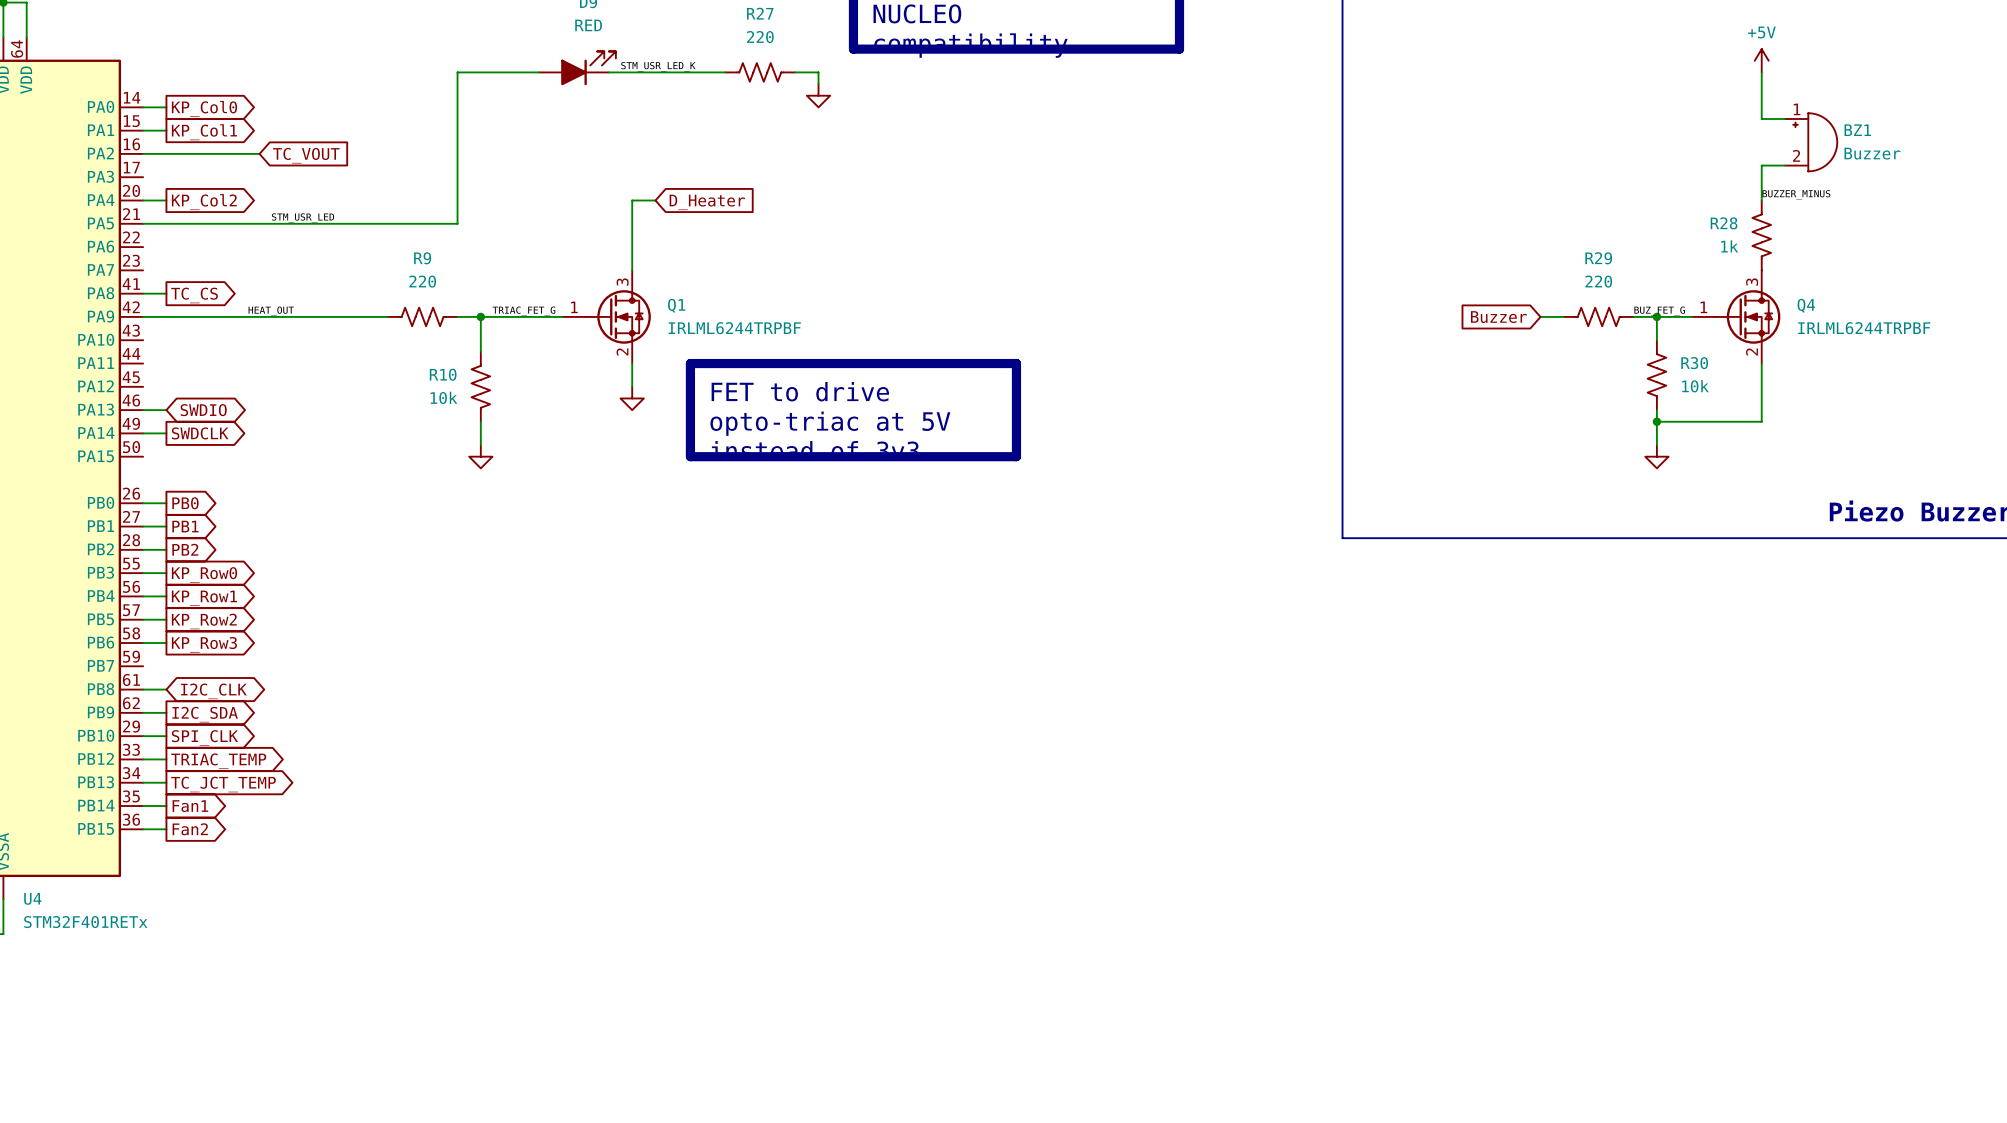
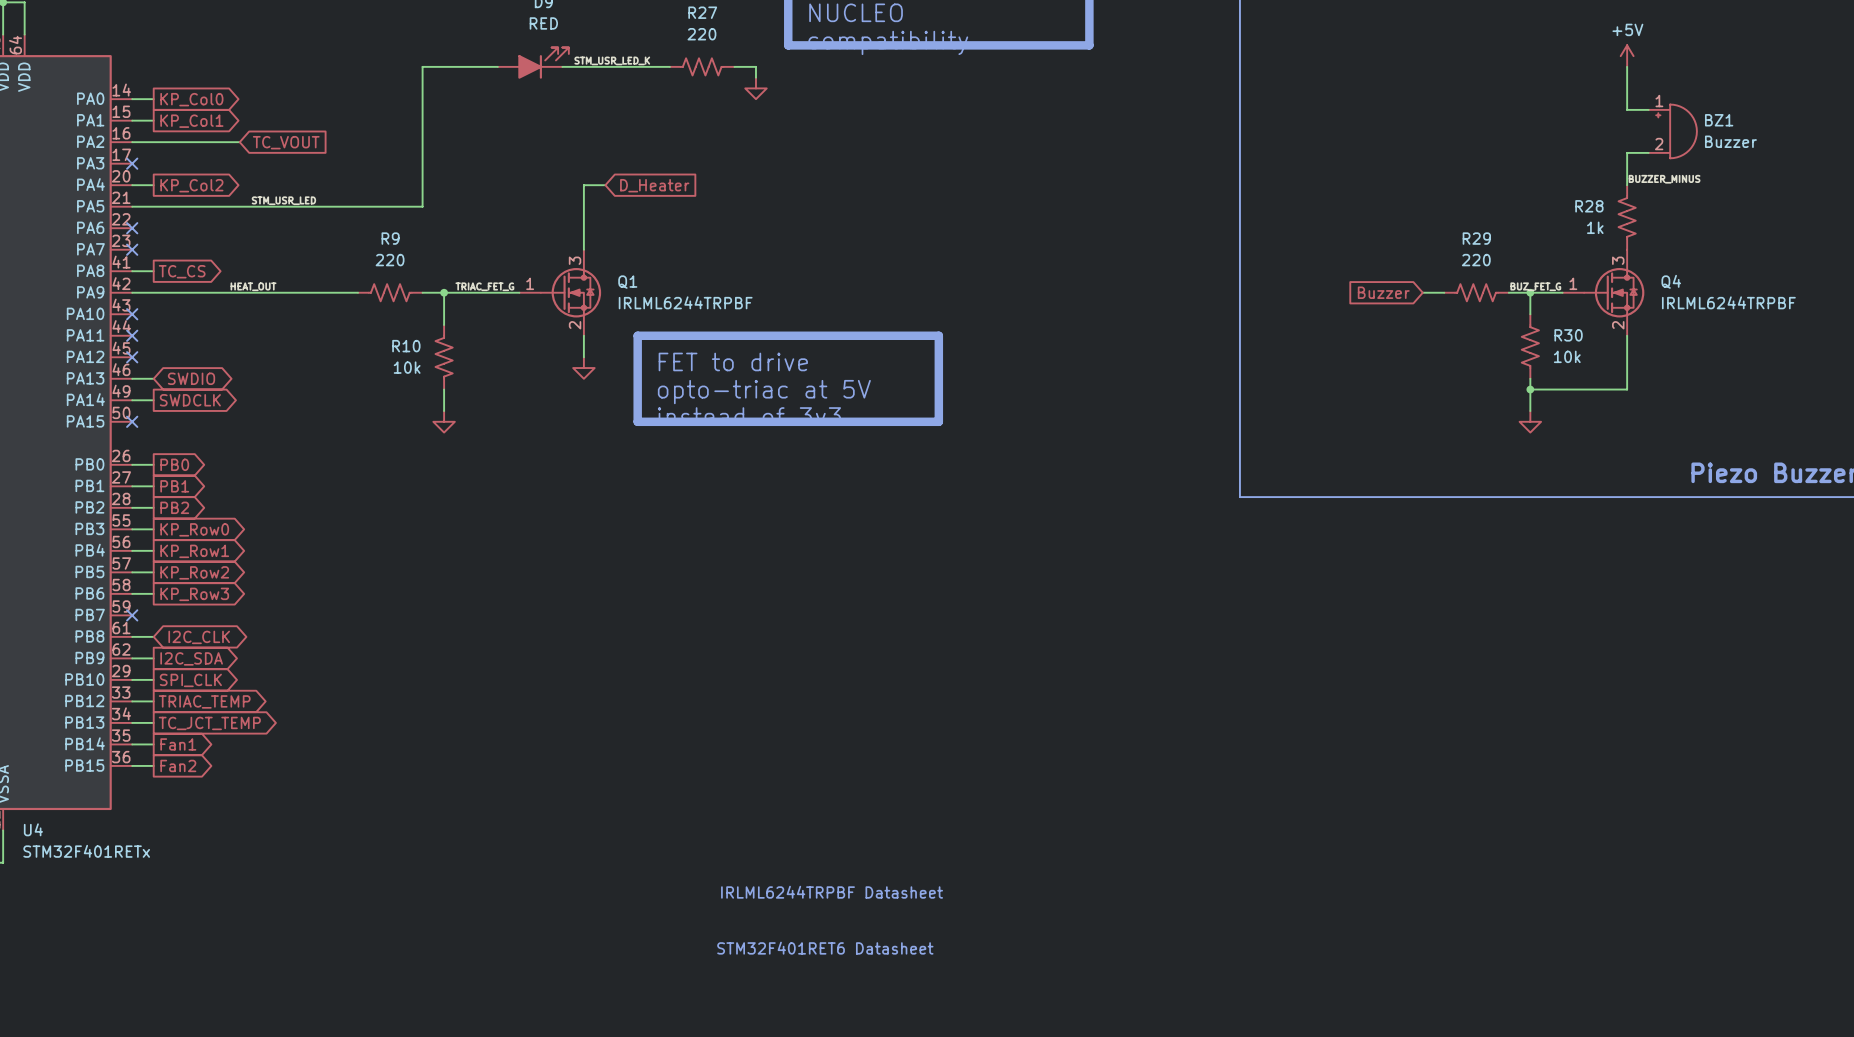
no-connect mark: none -> (132, 163)
no-connect mark: none -> (132, 228)
no-connect mark: none -> (132, 249)
no-connect mark: none -> (132, 314)
no-connect mark: none -> (132, 335)
no-connect mark: none -> (132, 357)
no-connect mark: none -> (132, 421)
no-connect mark: none -> (132, 615)
text: none -> IRLML6244TRPBF Datasheet (832, 892)
text: none -> STM32F401RET6 Datasheet (825, 948)

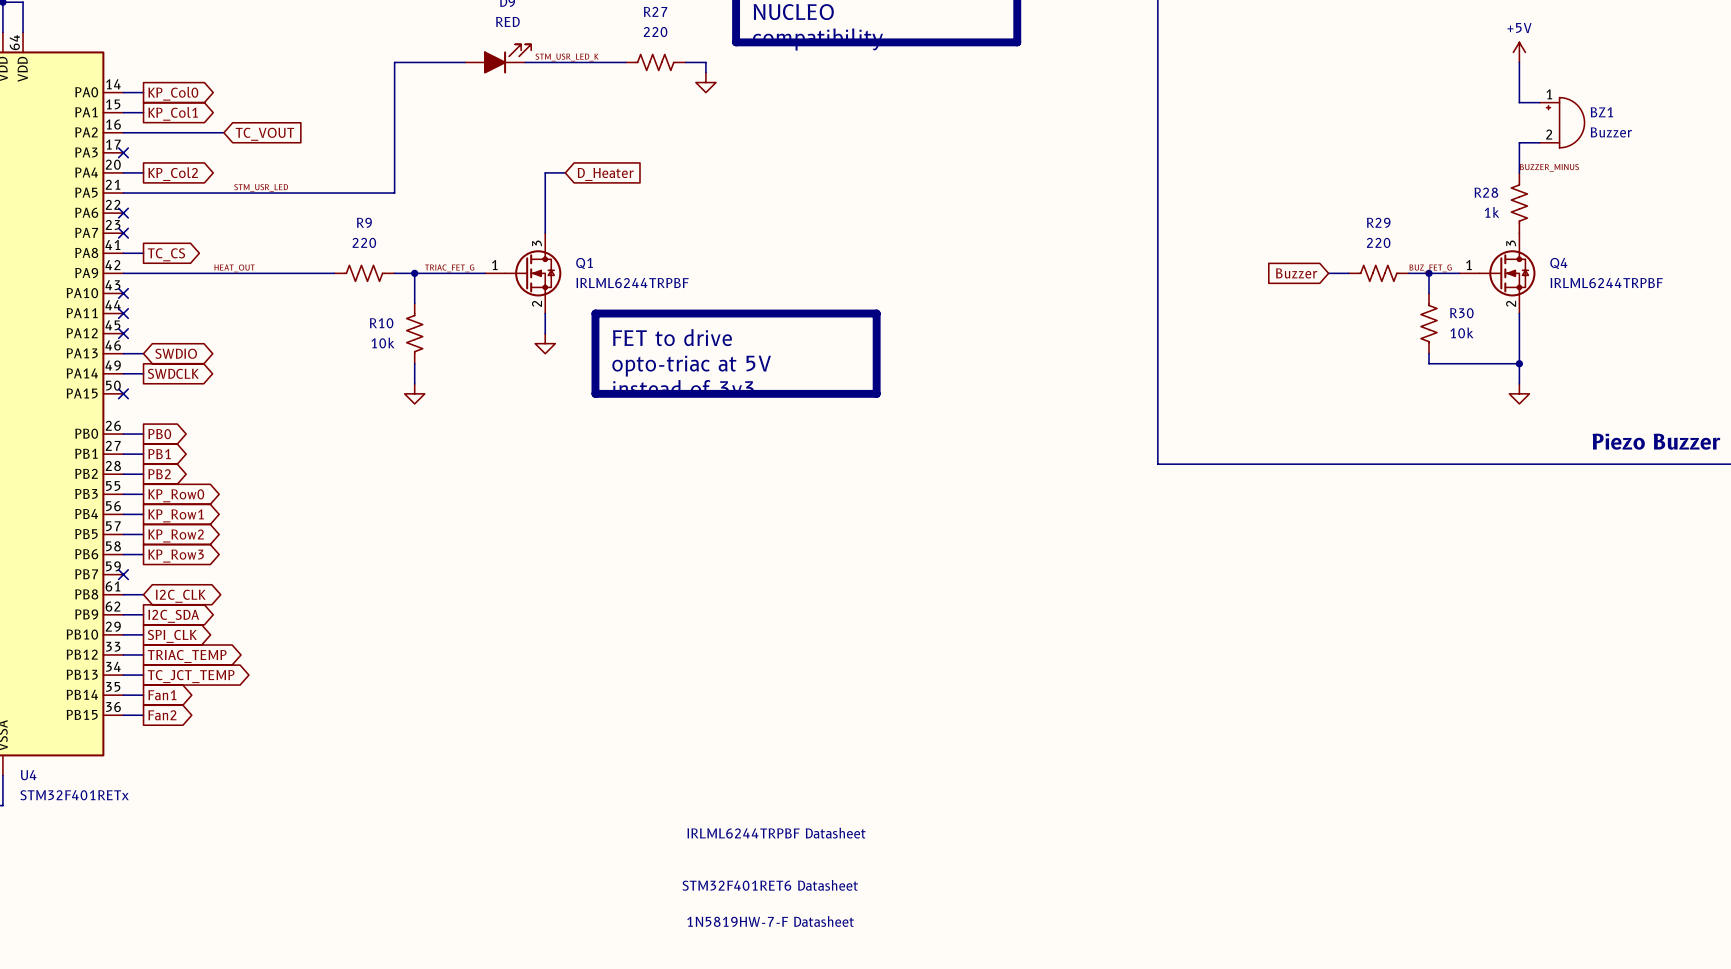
wire: (1530, 389) (1530, 411) -> (1519, 363) (1519, 383)
junction: (1530, 389) -> none
junction: none -> (1519, 363)
power symbol position: (1530, 421) -> (1519, 393)
text: none -> 1N5819HW-7-F Datasheet (770, 921)

